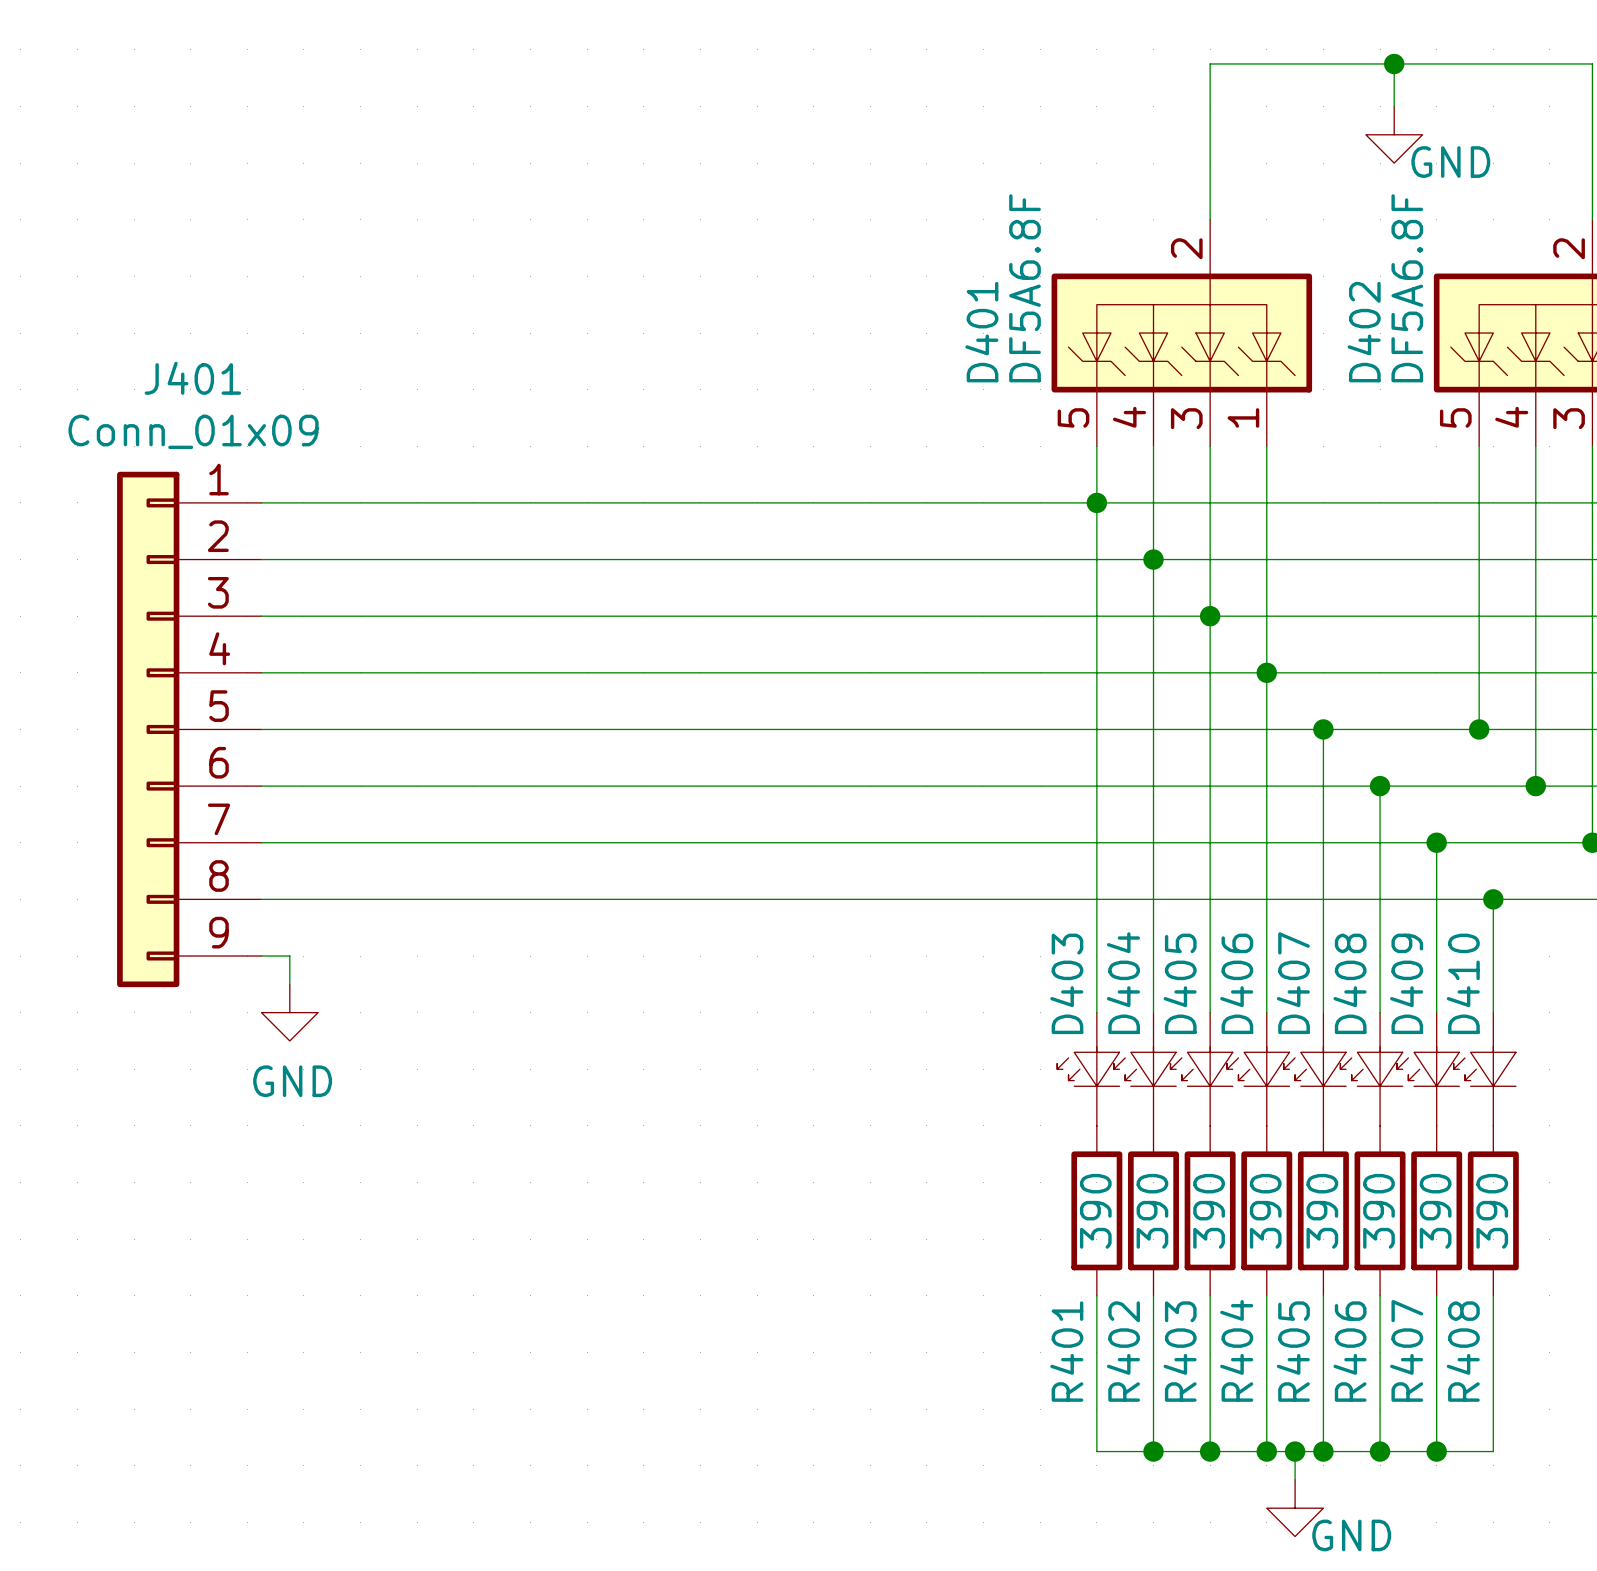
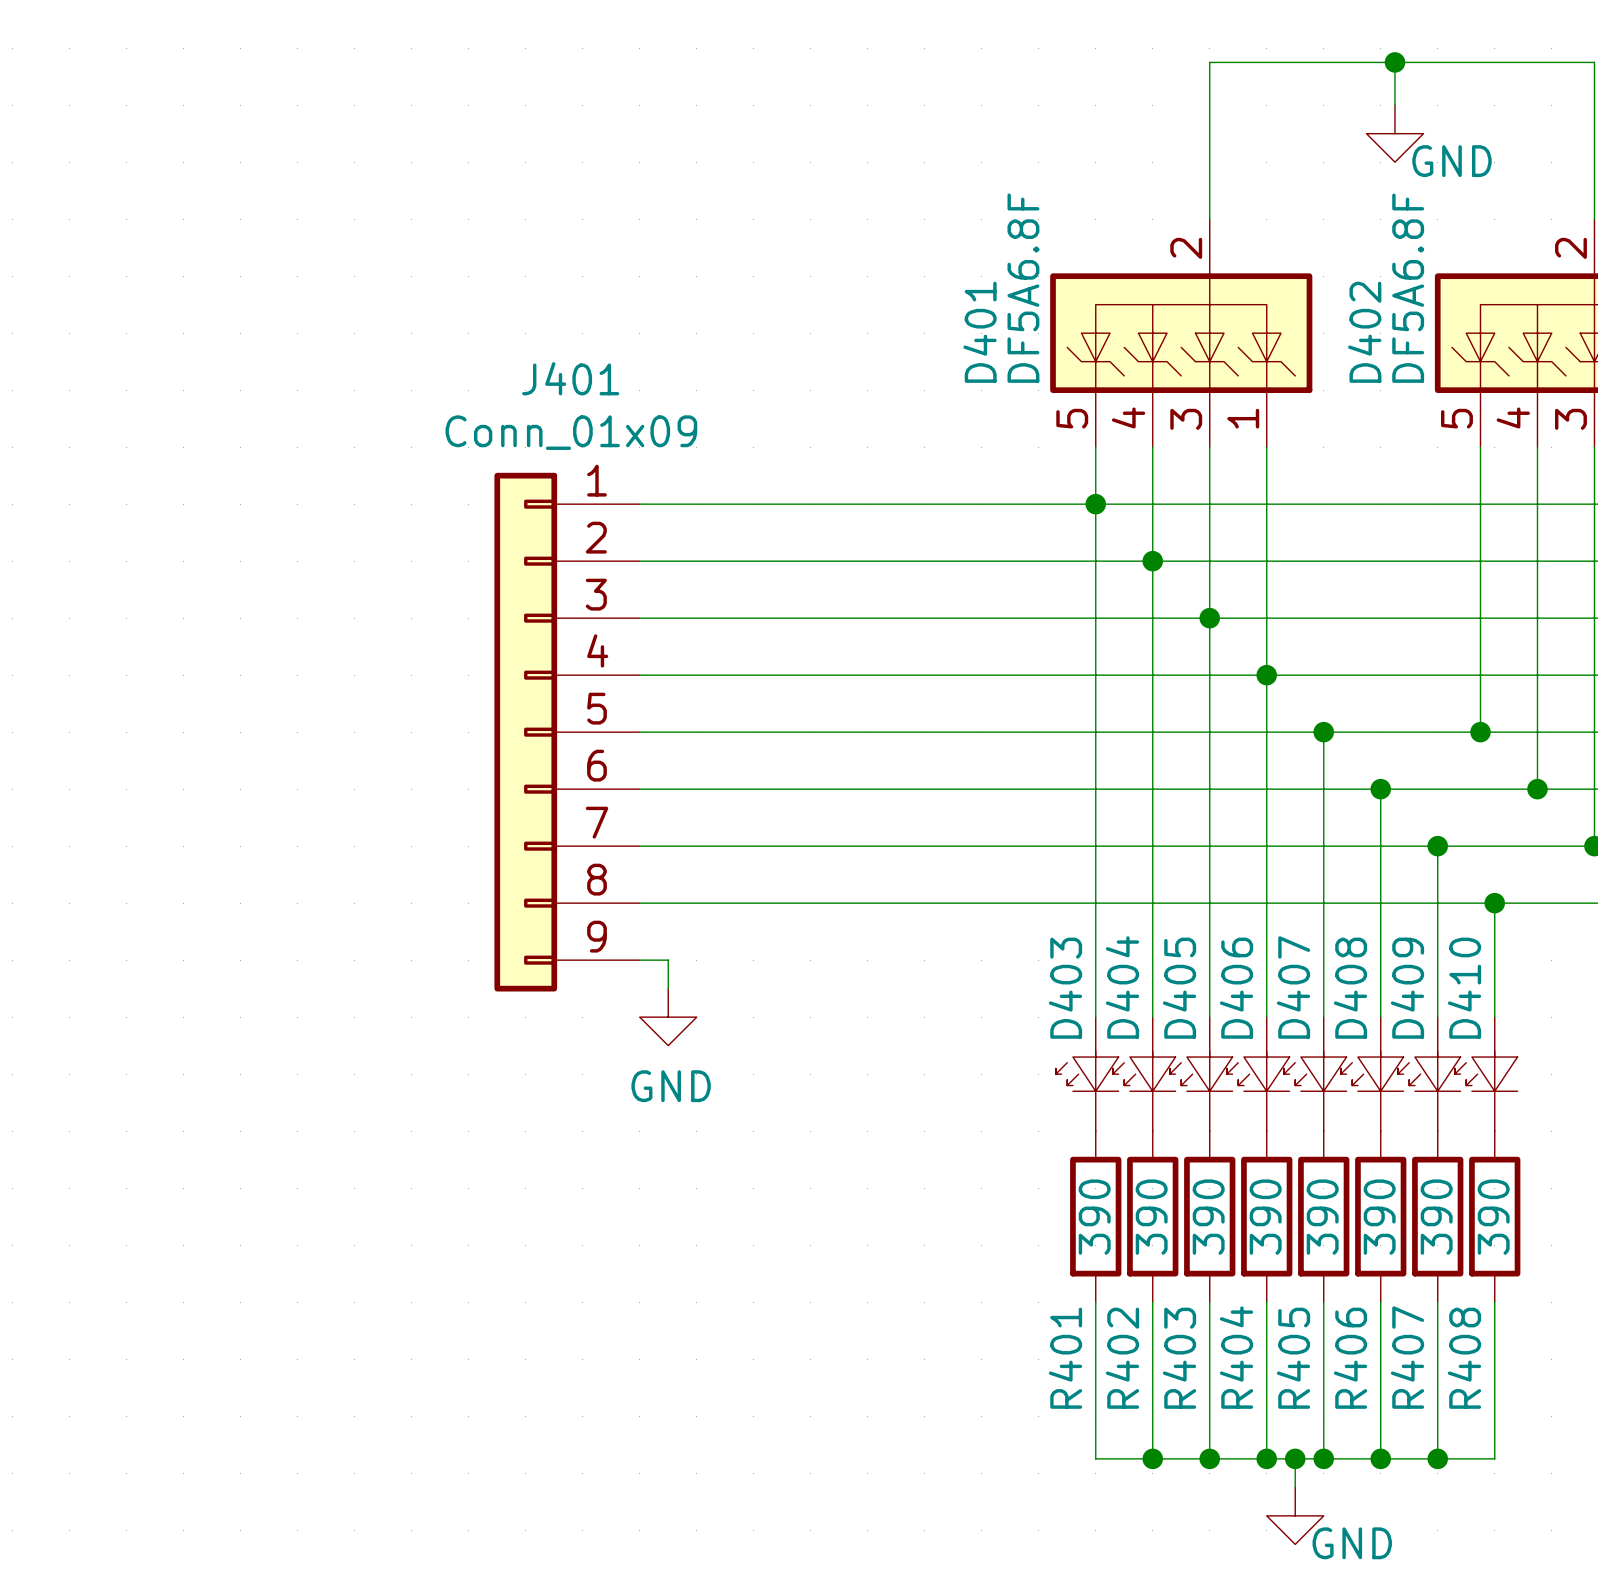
wire: (261, 502) (643, 502) -> none
wire: (261, 559) (643, 559) -> none
wire: (261, 616) (643, 616) -> none
wire: (261, 672) (643, 672) -> none
J401 position: (189, 729) -> (567, 732)
wire: (261, 729) (643, 729) -> none
wire: (261, 786) (643, 786) -> none
wire: (261, 842) (643, 842) -> none
wire: (261, 899) (643, 899) -> none
wire: (261, 956) (289, 956) (289, 984) -> (639, 960) (668, 960) (668, 988)
power symbol position: GND (289, 1012) -> GND (668, 1017)

